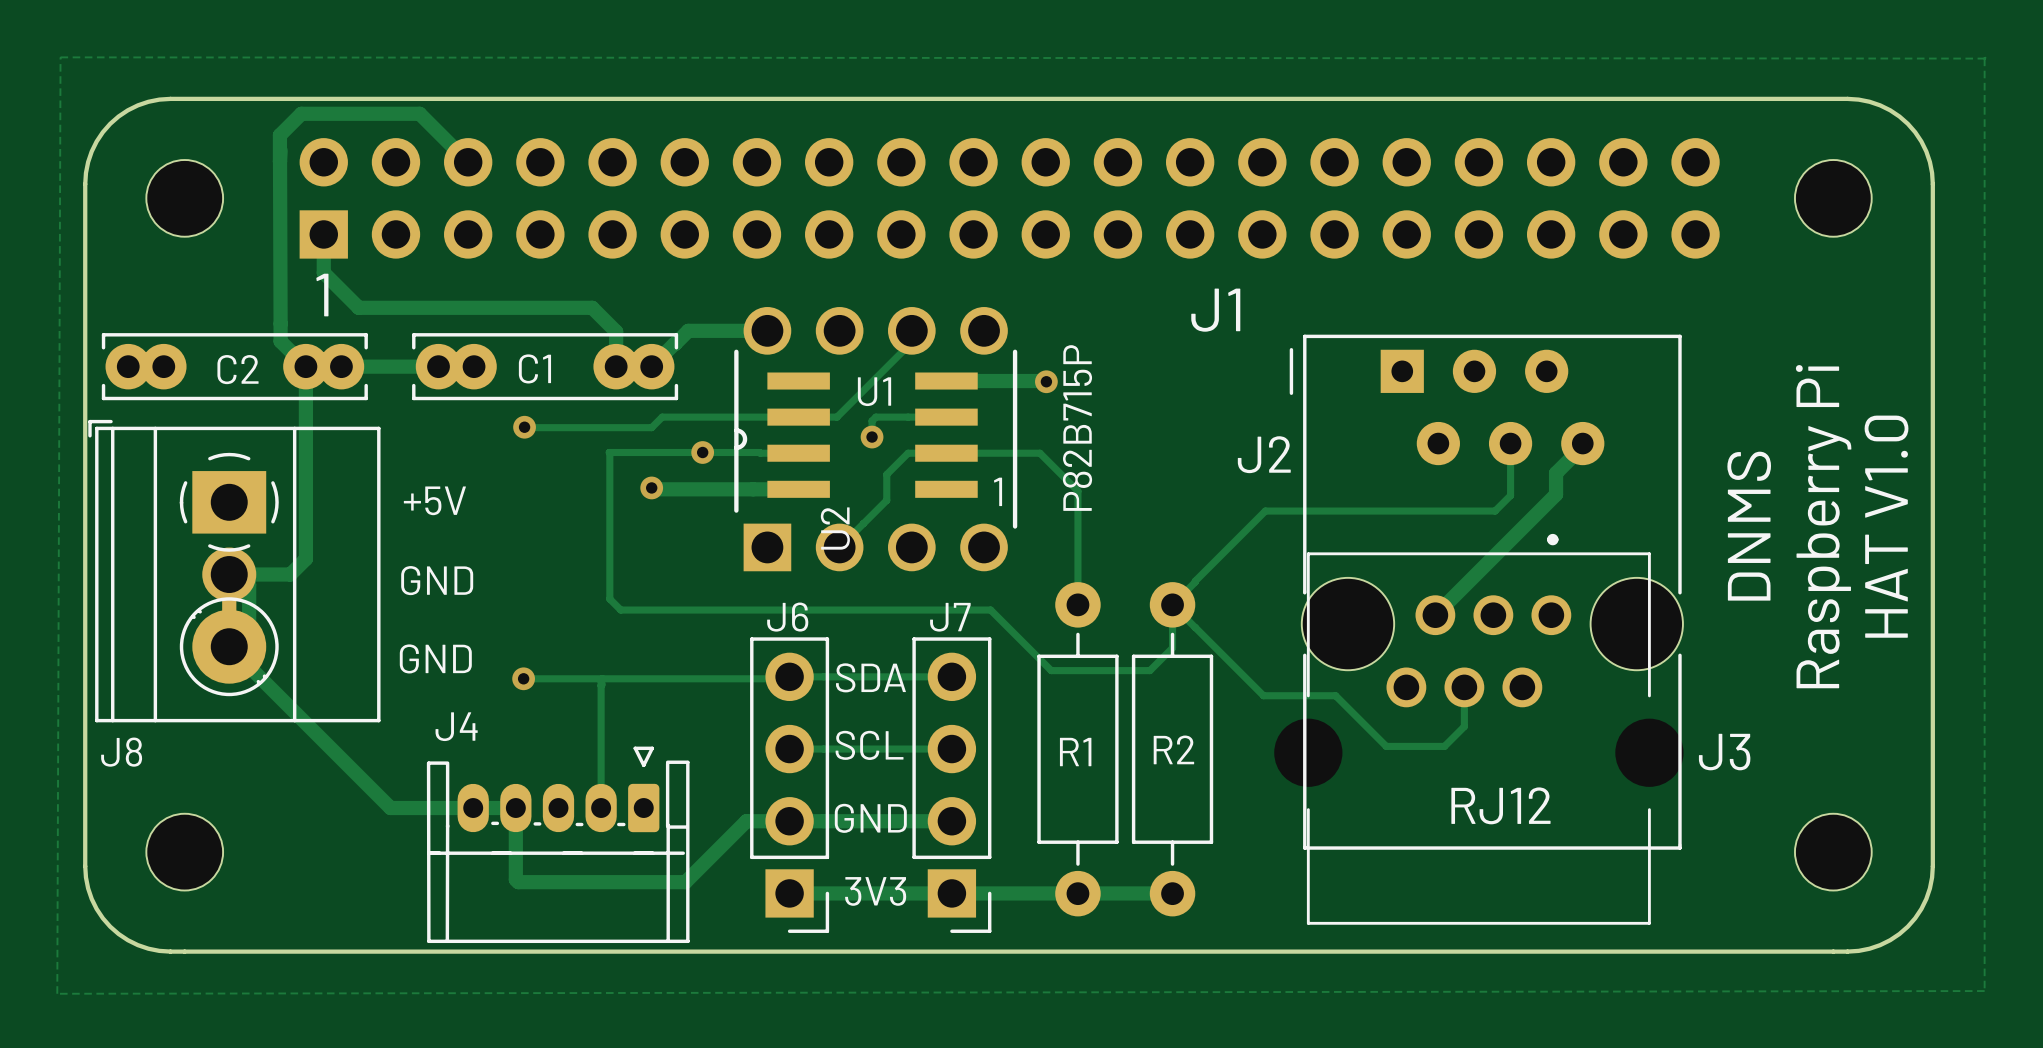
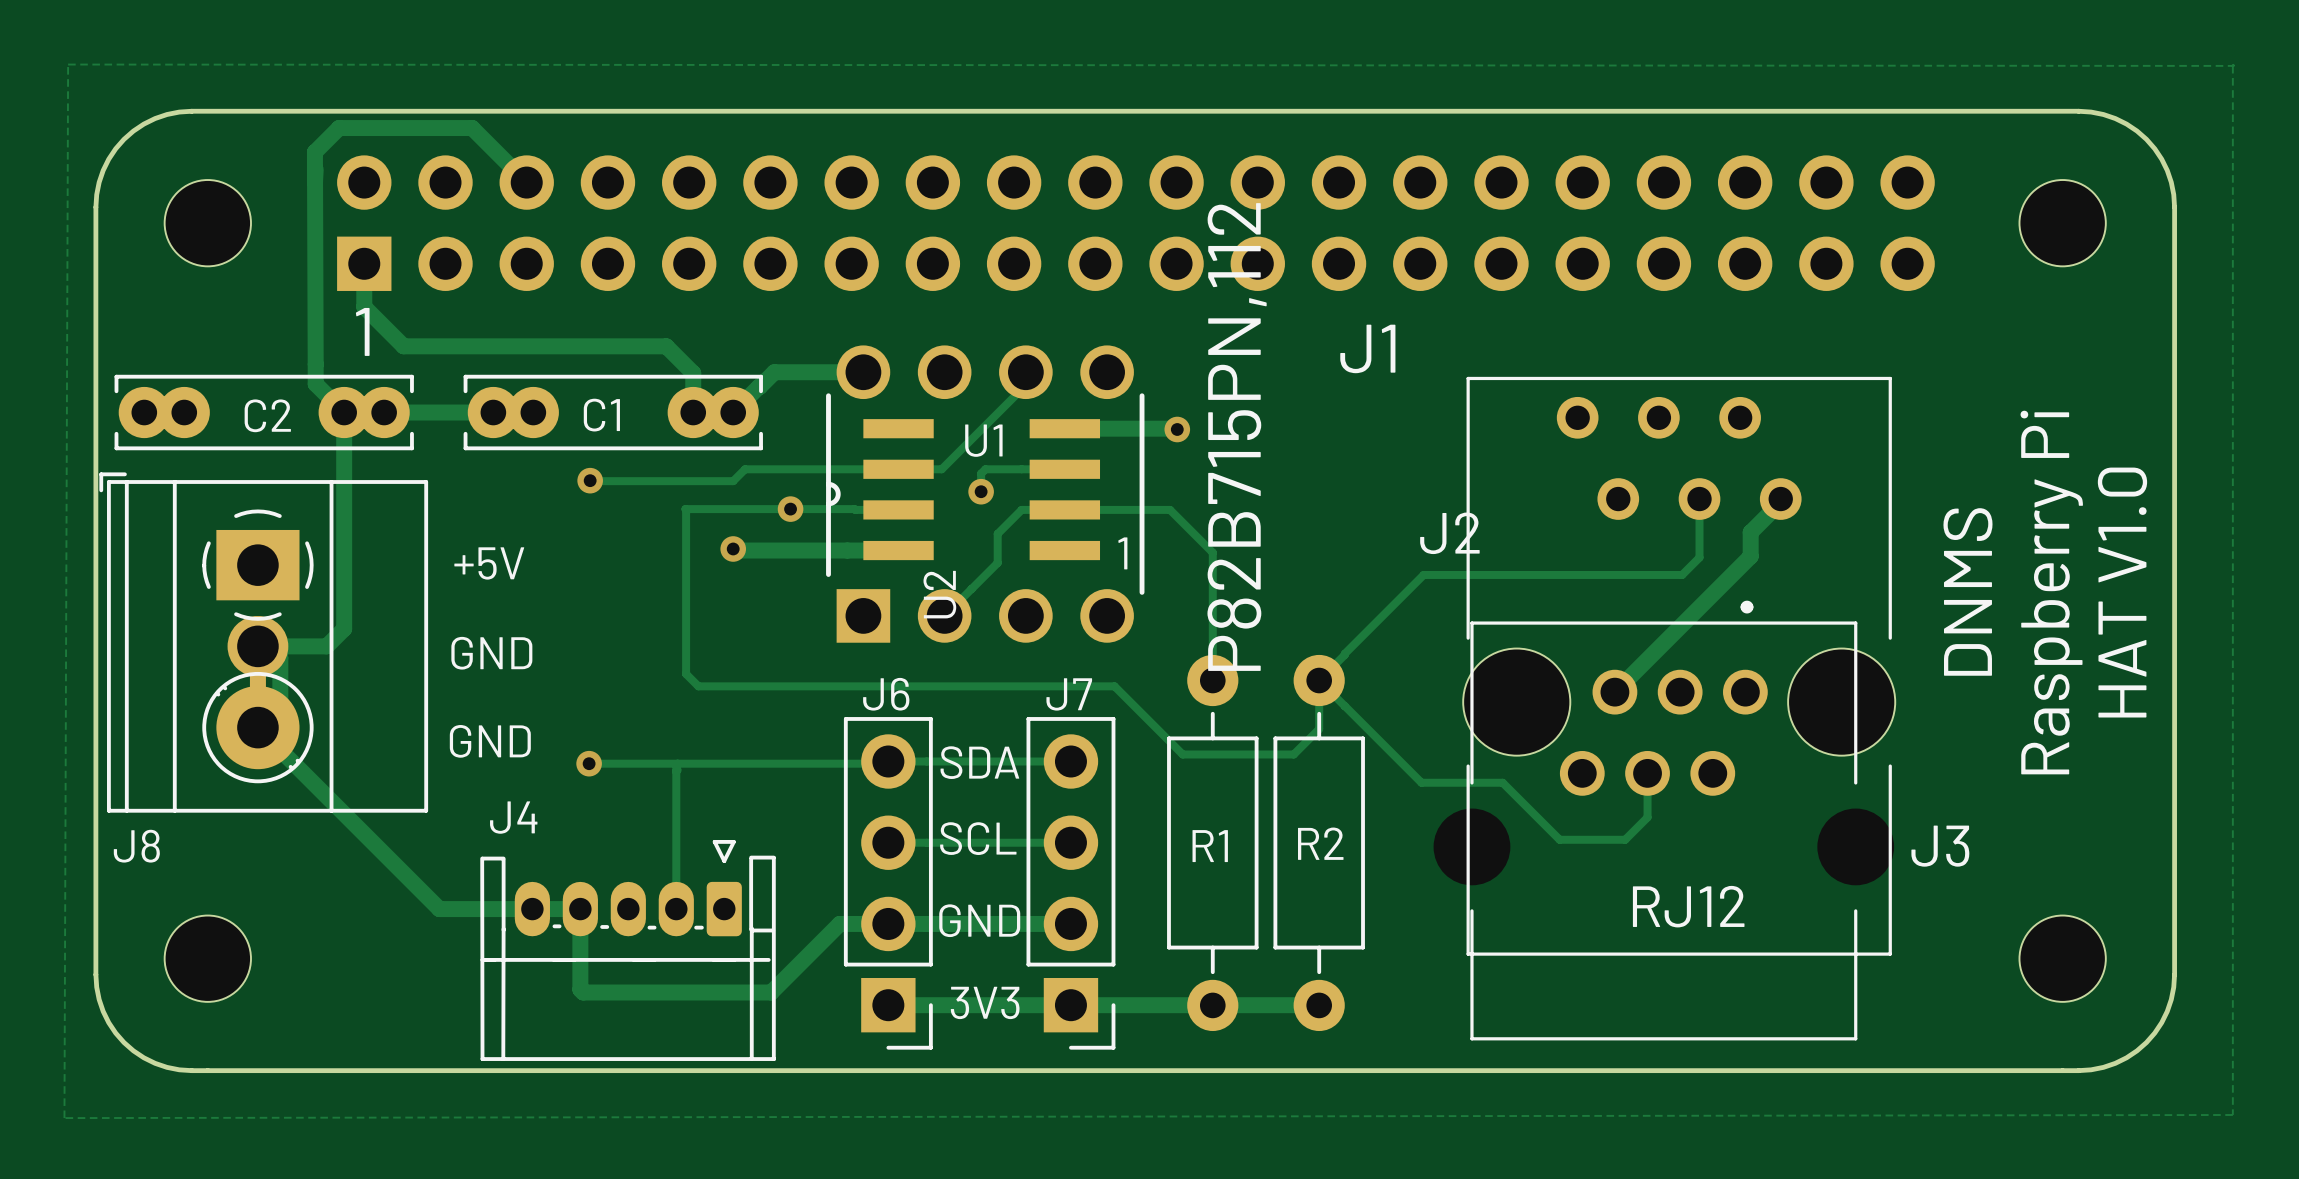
J2 footprint: [1289, 334, 1683, 850] -> [1463, 376, 1896, 956]
U1 value: P82B715P (1077, 428) -> P82B715PN,112 (1237, 437)
J2 name position: J2 (1264, 454) -> J2 (1449, 533)

